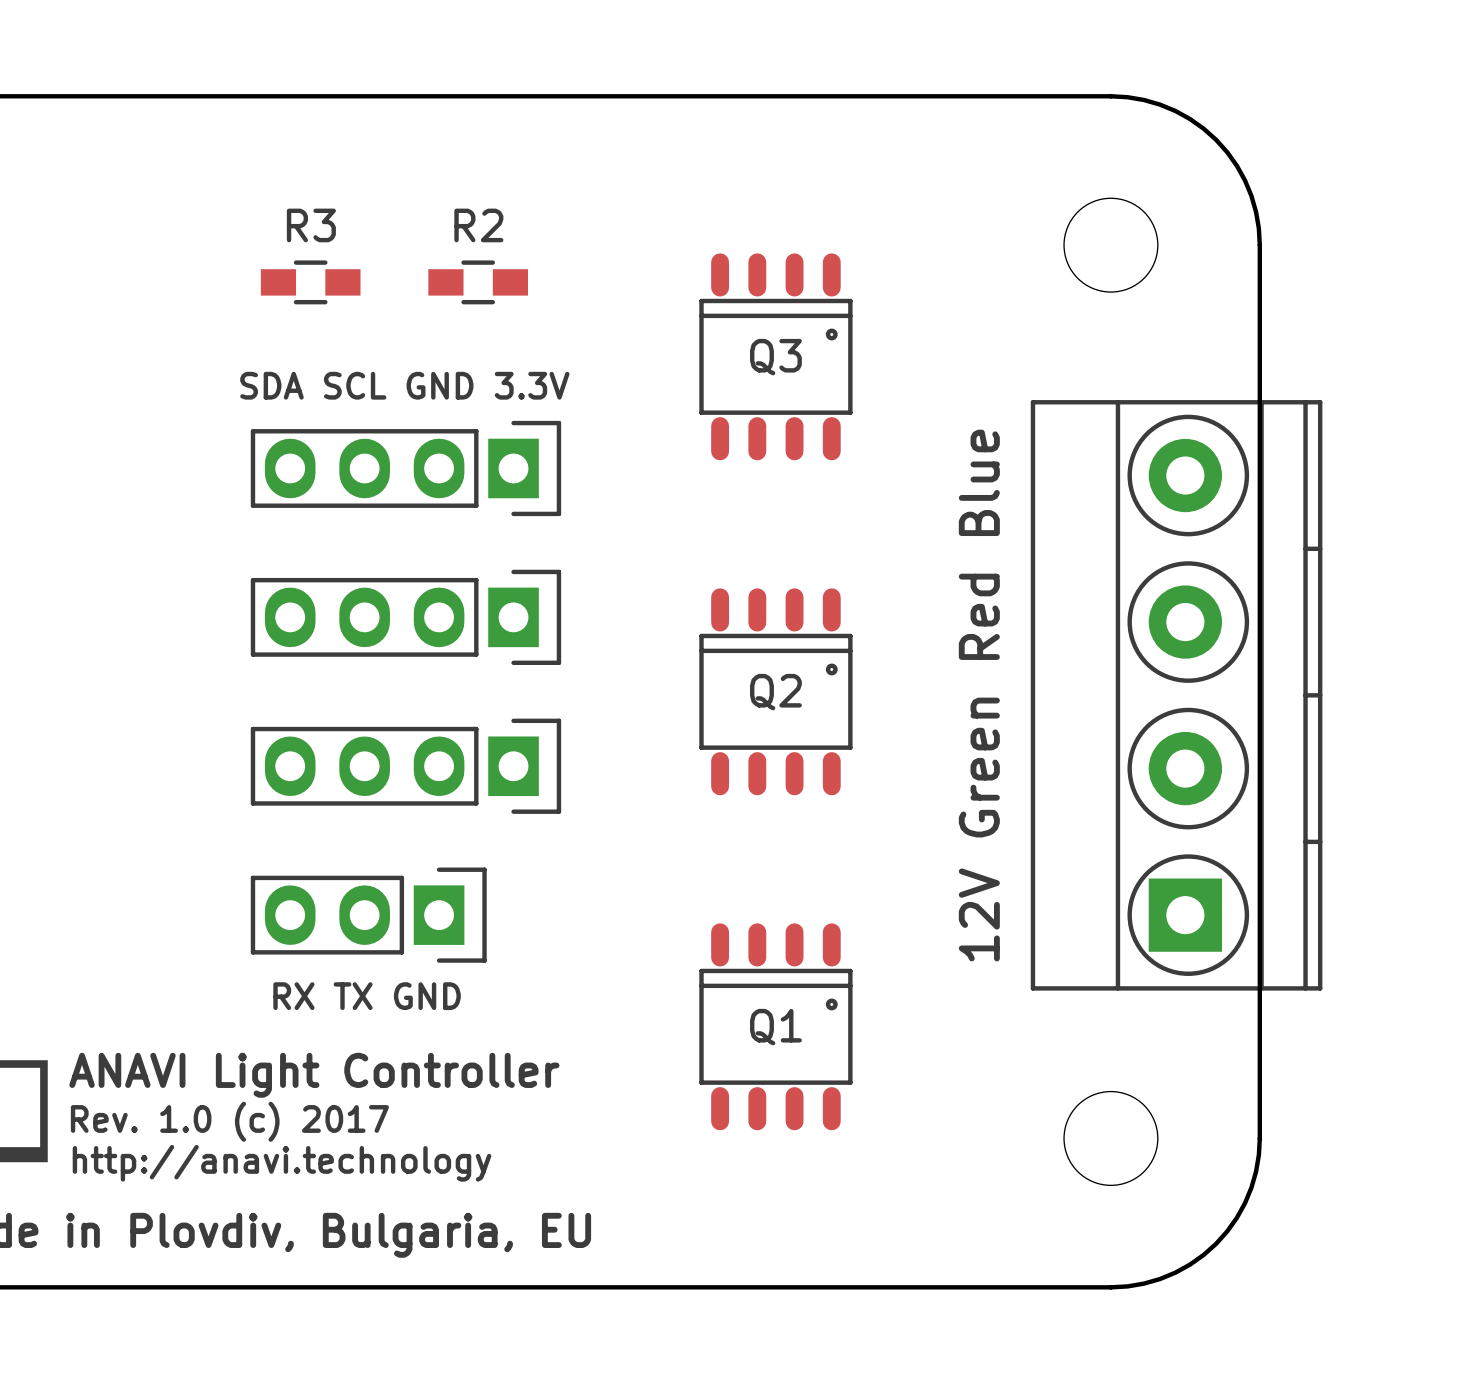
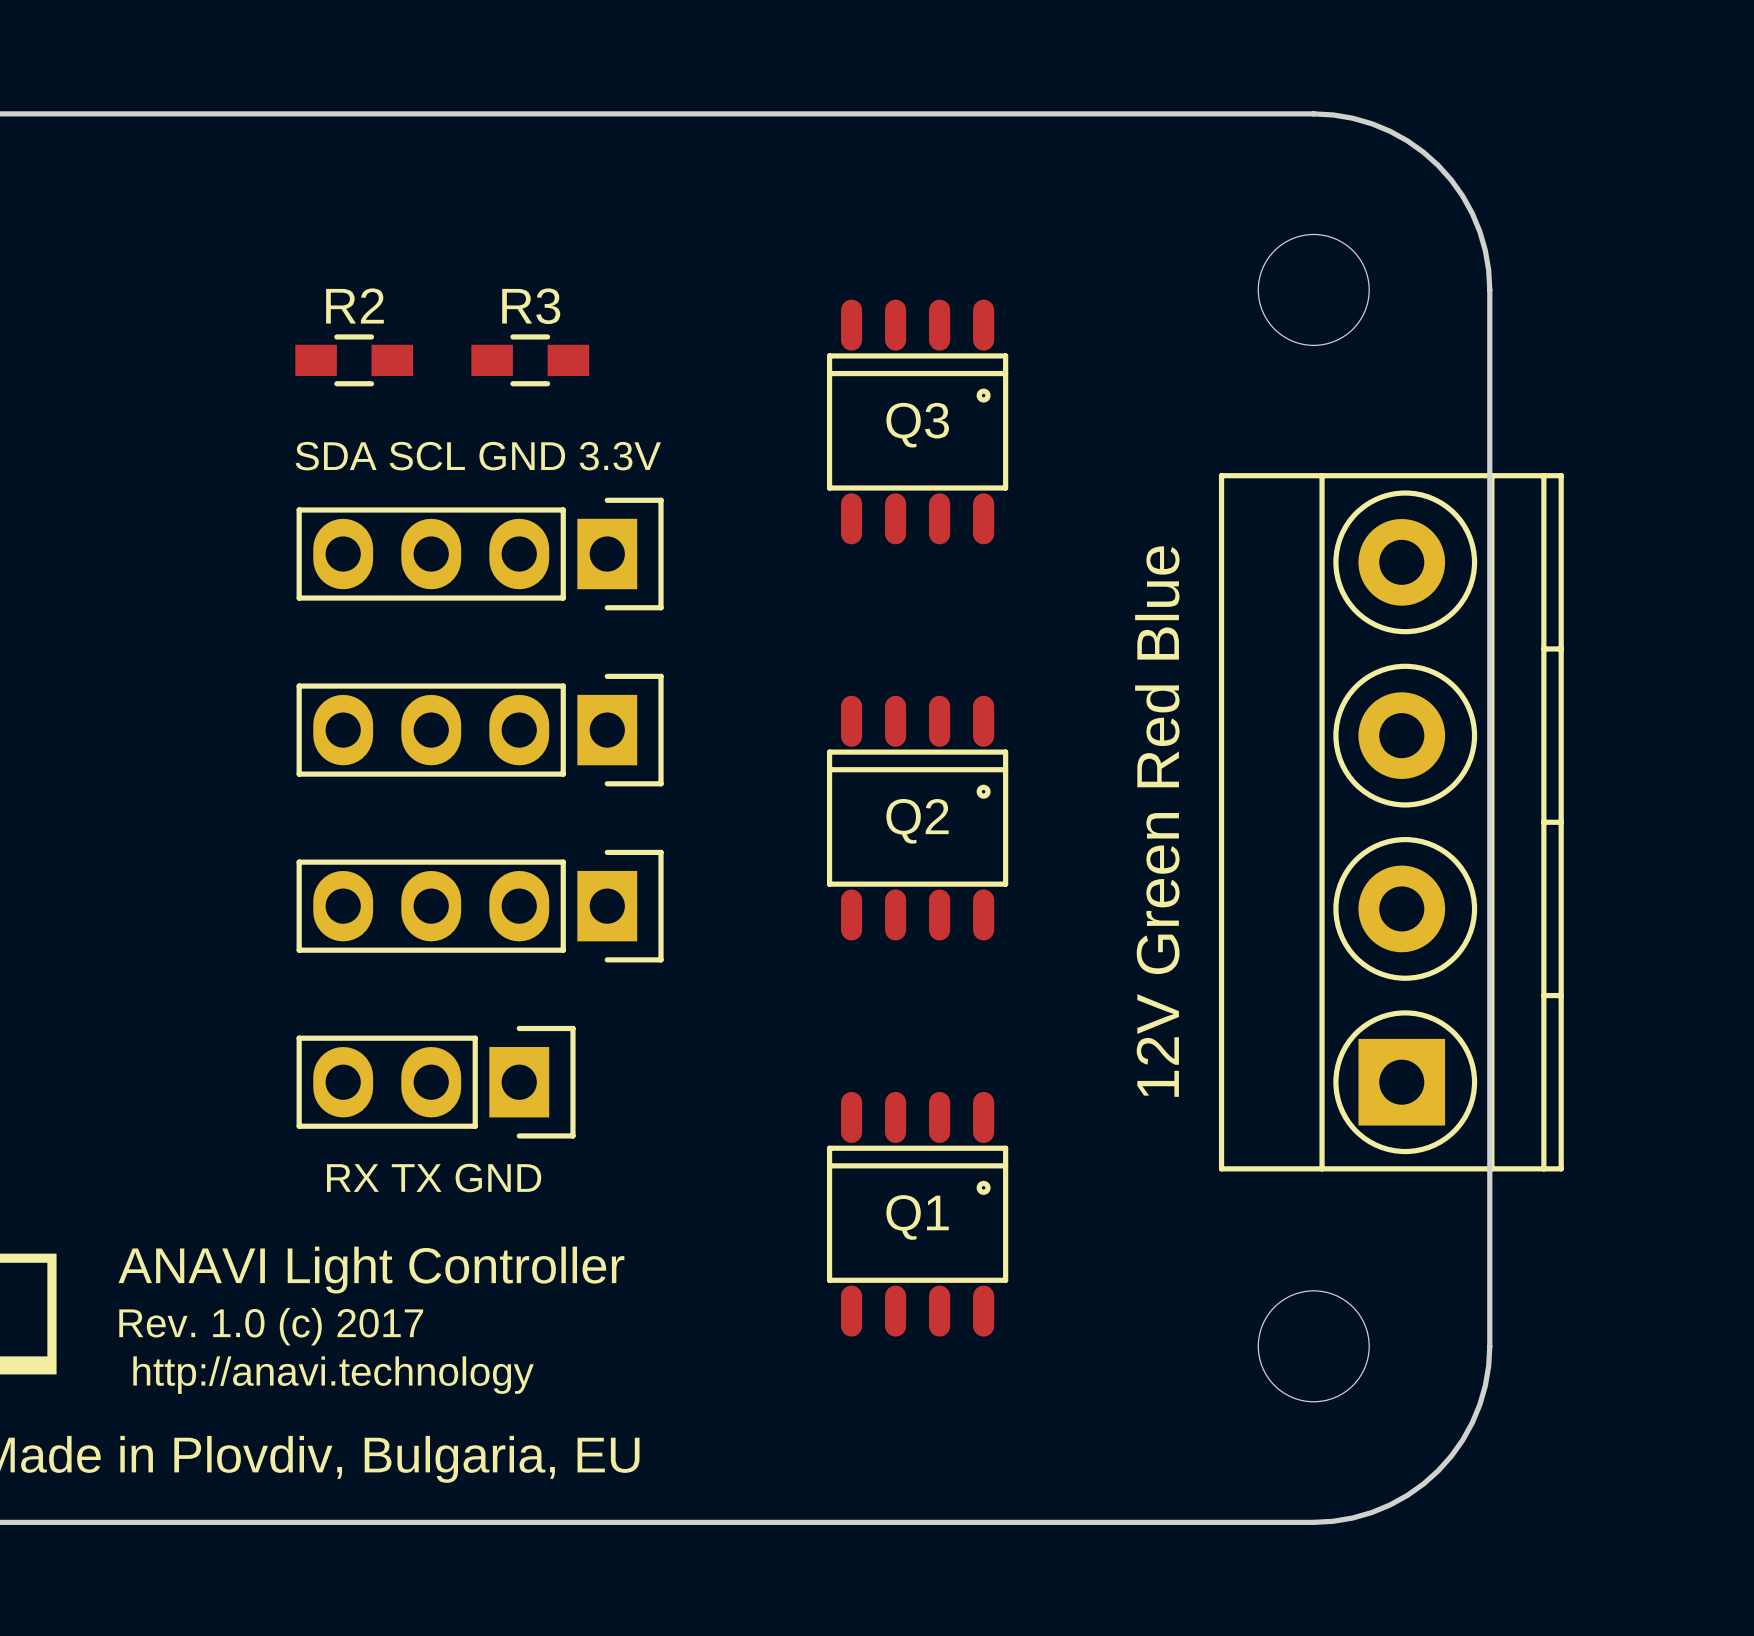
R3 name position: R3 (311, 225) -> R3 (531, 306)
R2 name position: R2 (478, 225) -> R2 (354, 305)
R3 position: (310, 282) -> (530, 360)
R2 position: (478, 282) -> (354, 360)

